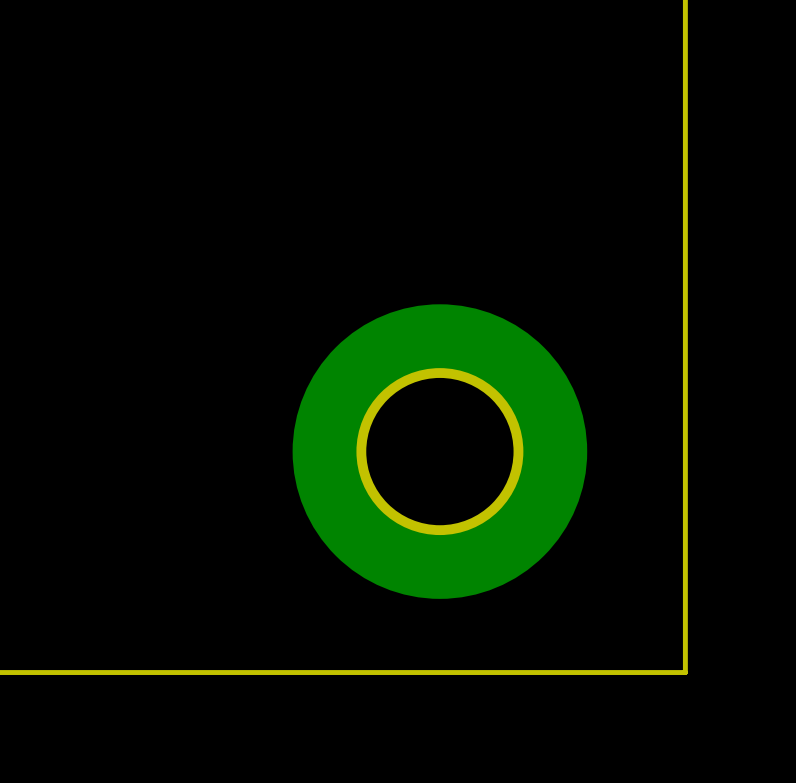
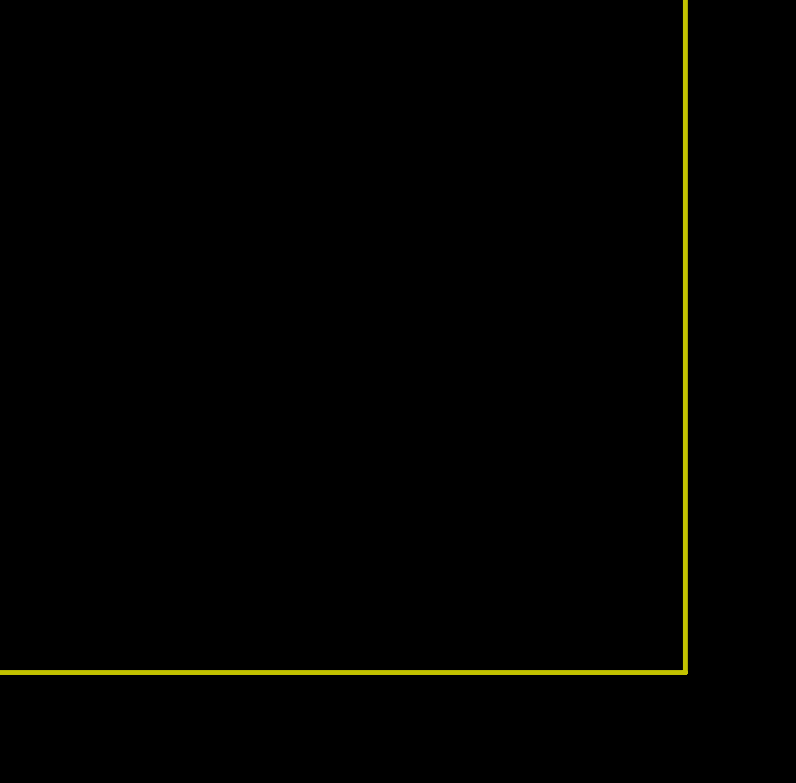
part: (439, 451) -> none

